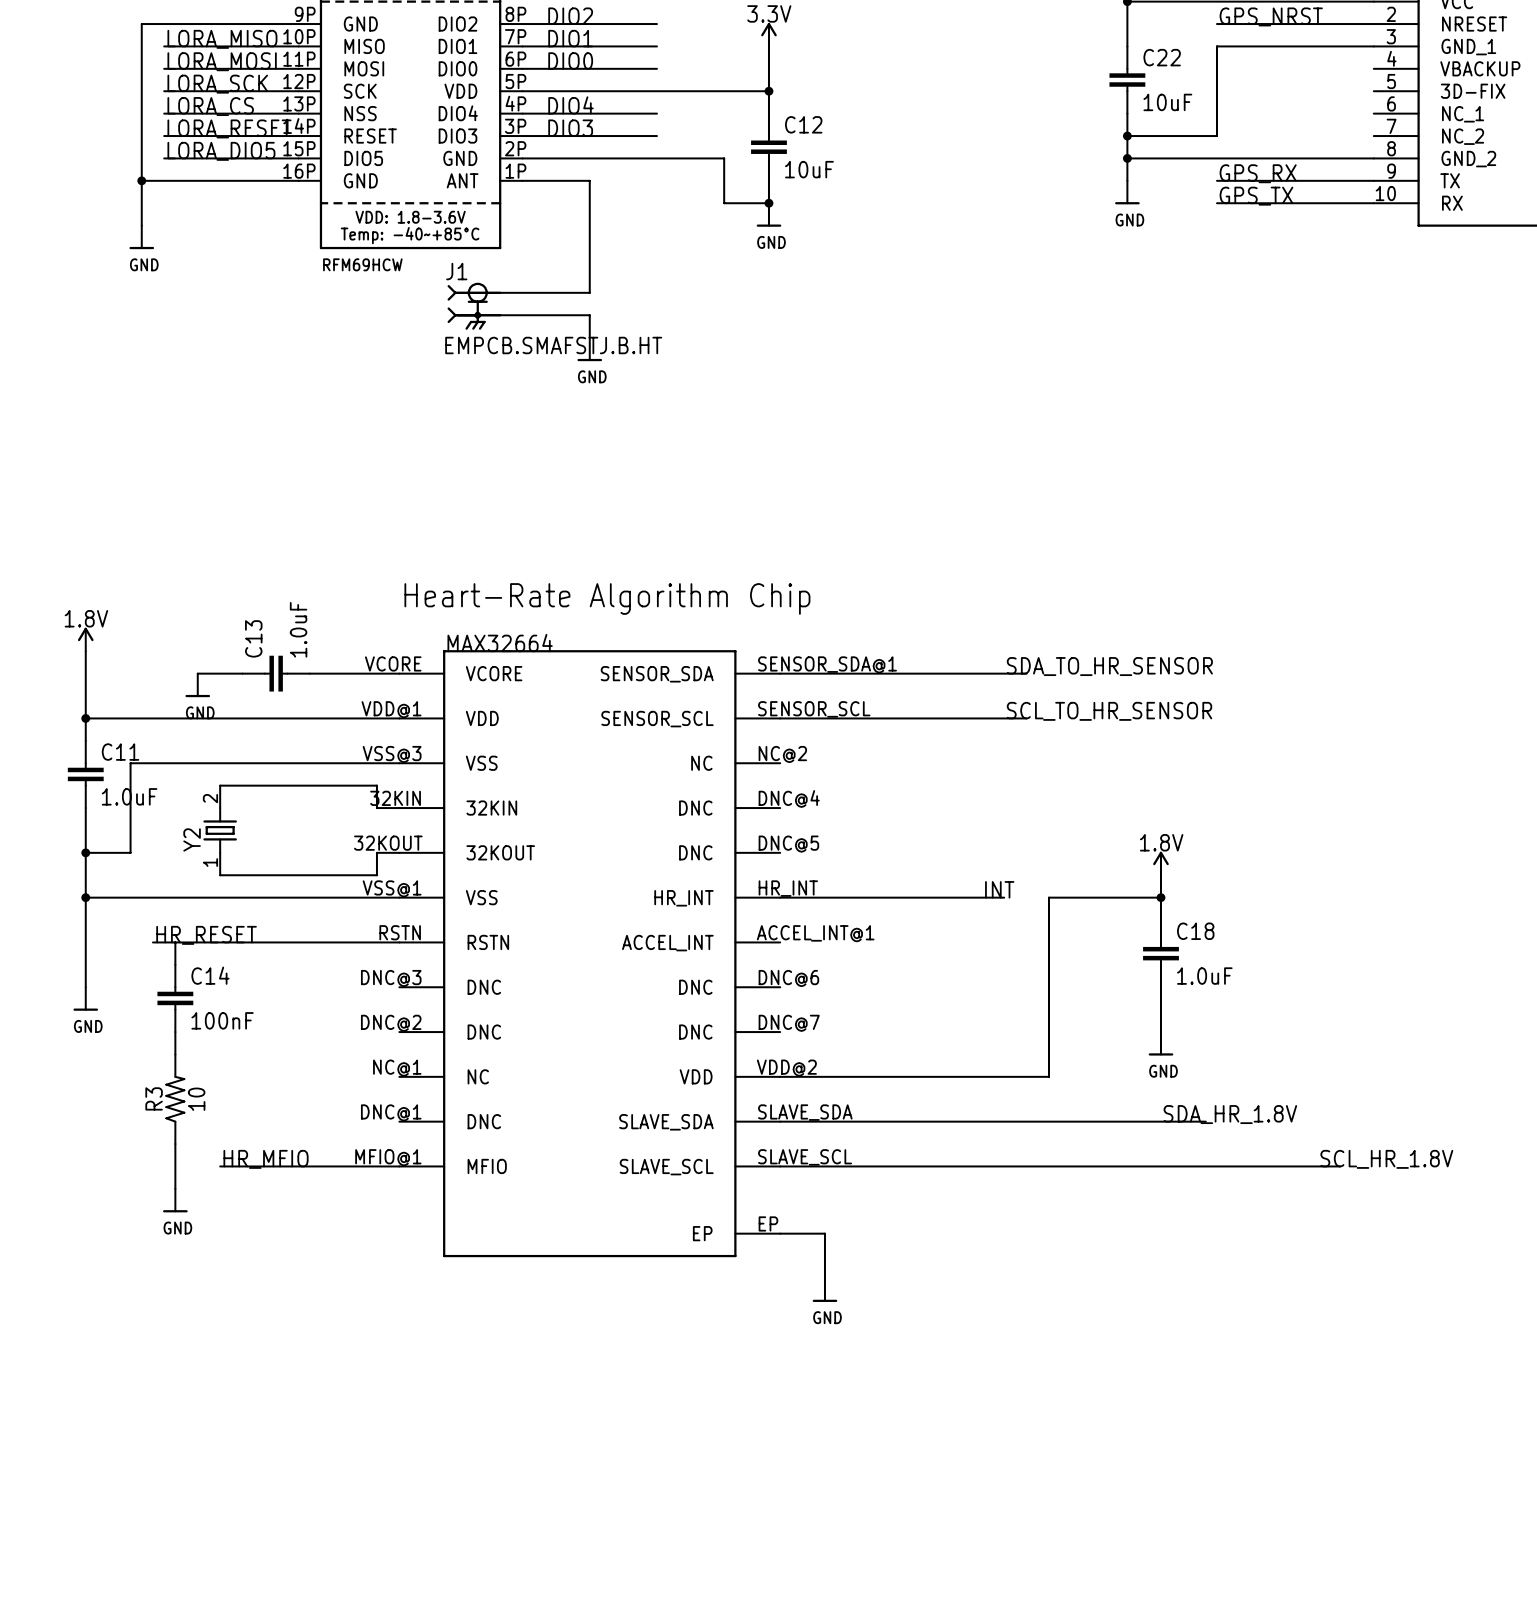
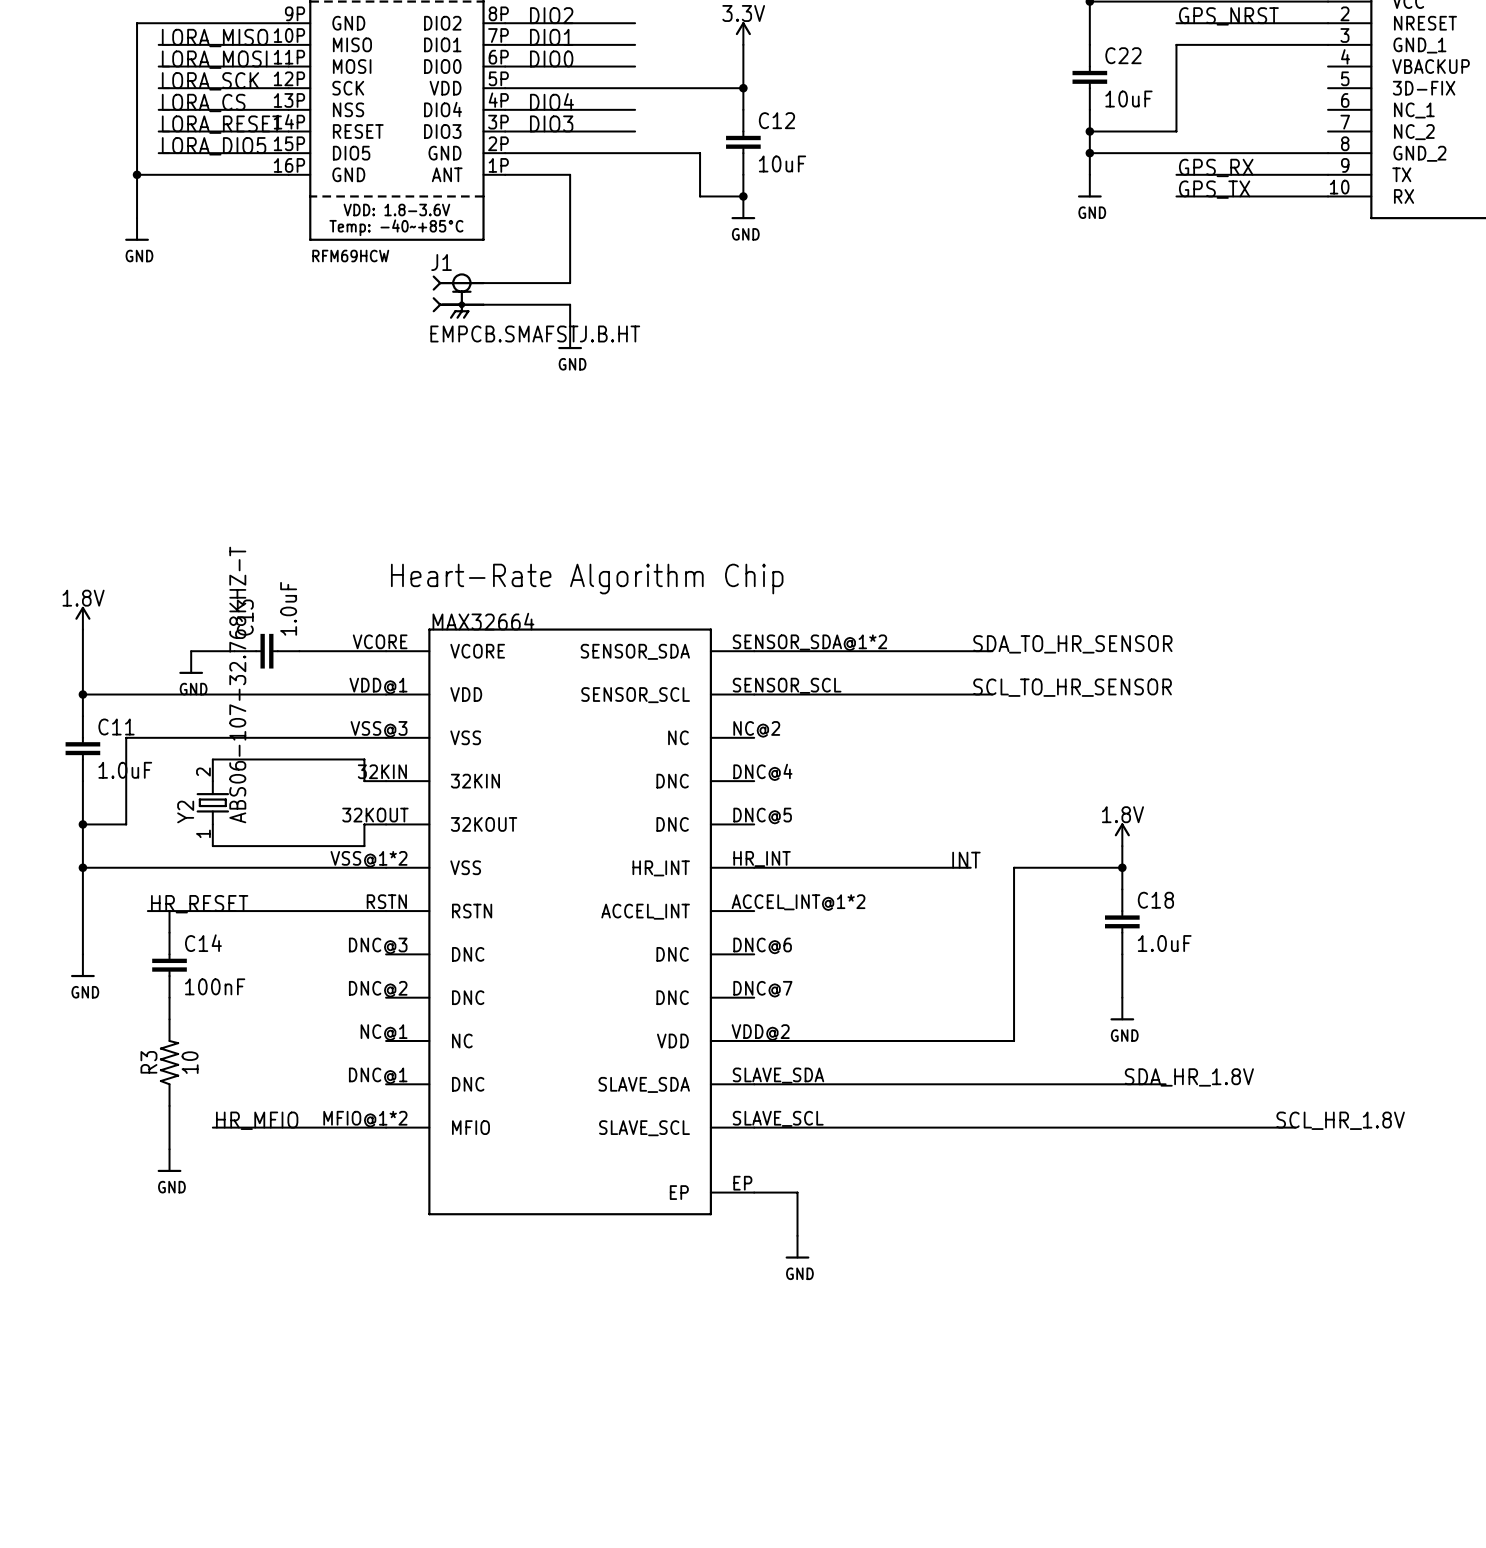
part pin number: SENSOR_SDA@1 (827, 664) -> SENSOR_SDA@1*2 (809, 642)
Y2 value: none -> ABS06-107-32.768KHZ-T (237, 685)
part pin number: VSS@1 (392, 888) -> VSS@1*2 (369, 859)
part pin number: ACCEL_INT@1 (815, 933) -> ACCEL_INT@1*2 (798, 902)
part pin number: MFIO@1 (388, 1157) -> MFIO@1*2 (365, 1119)

